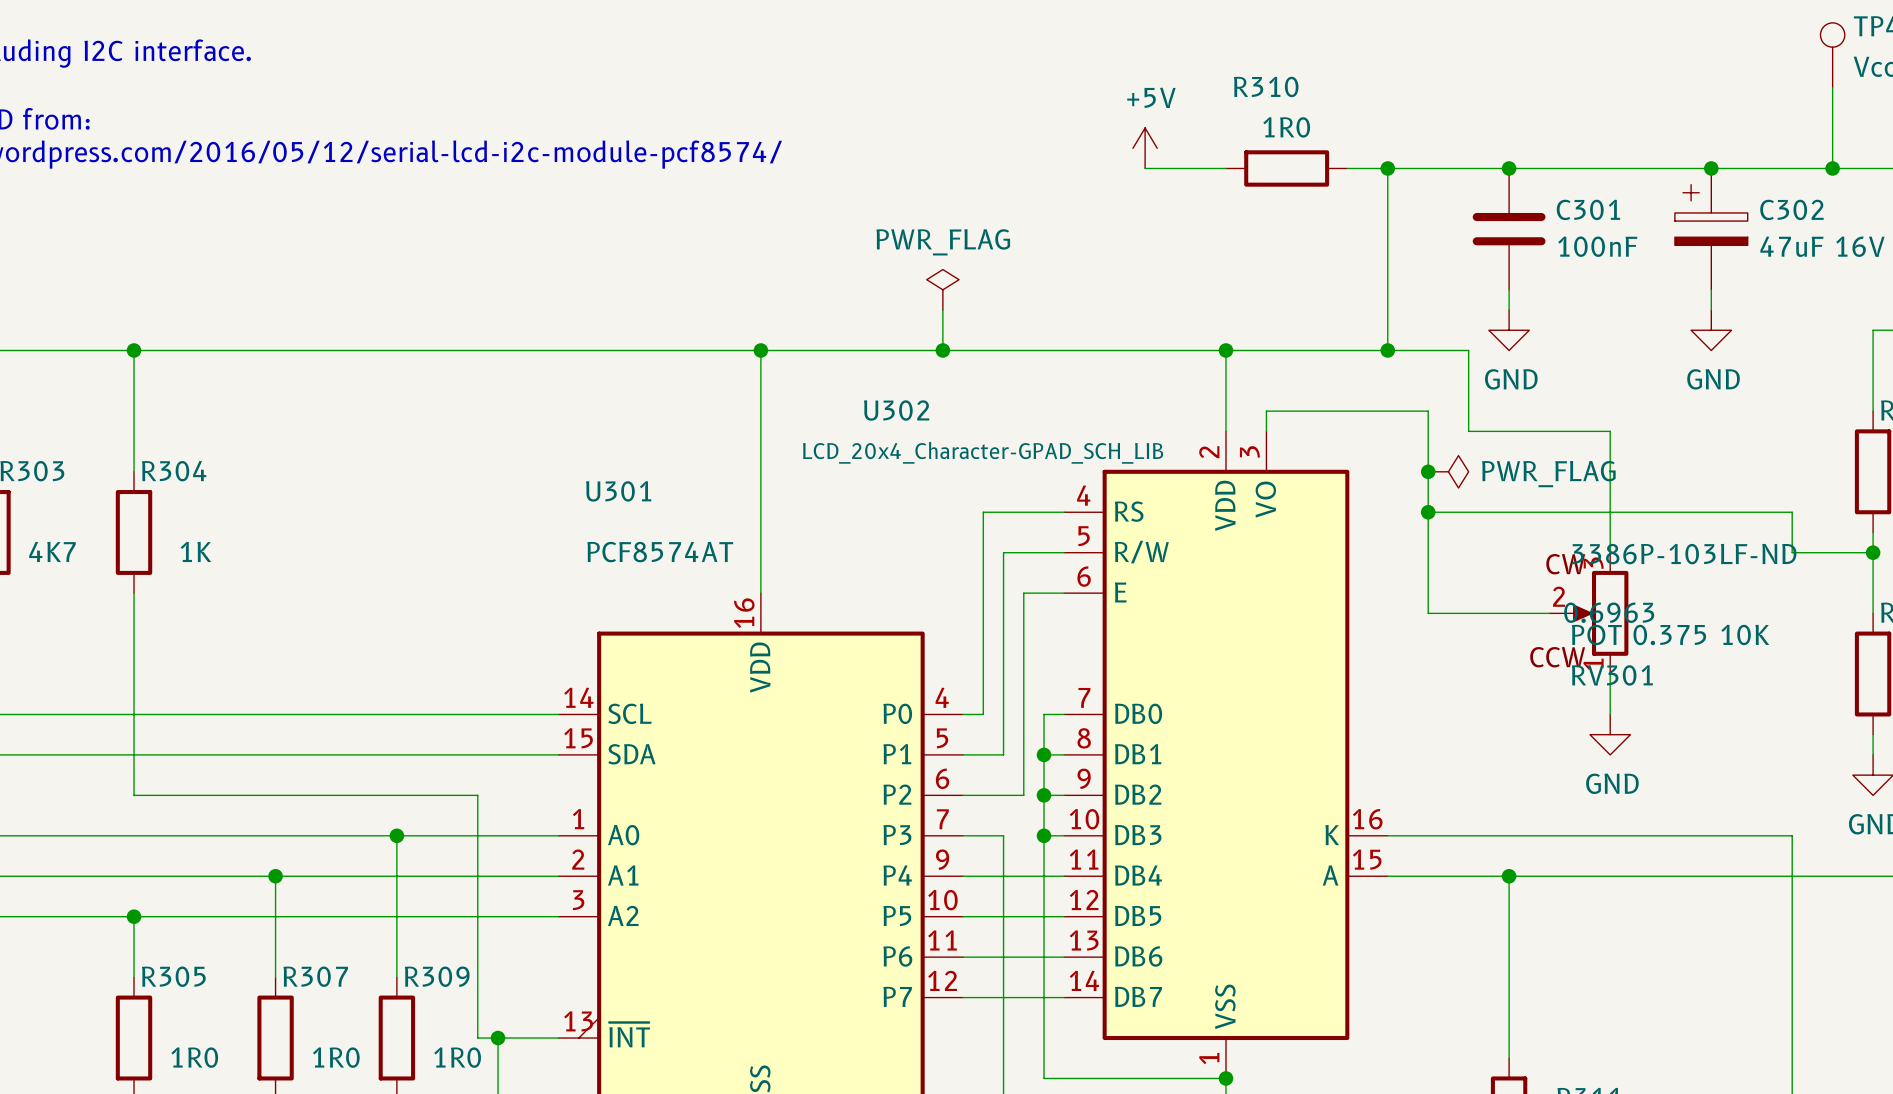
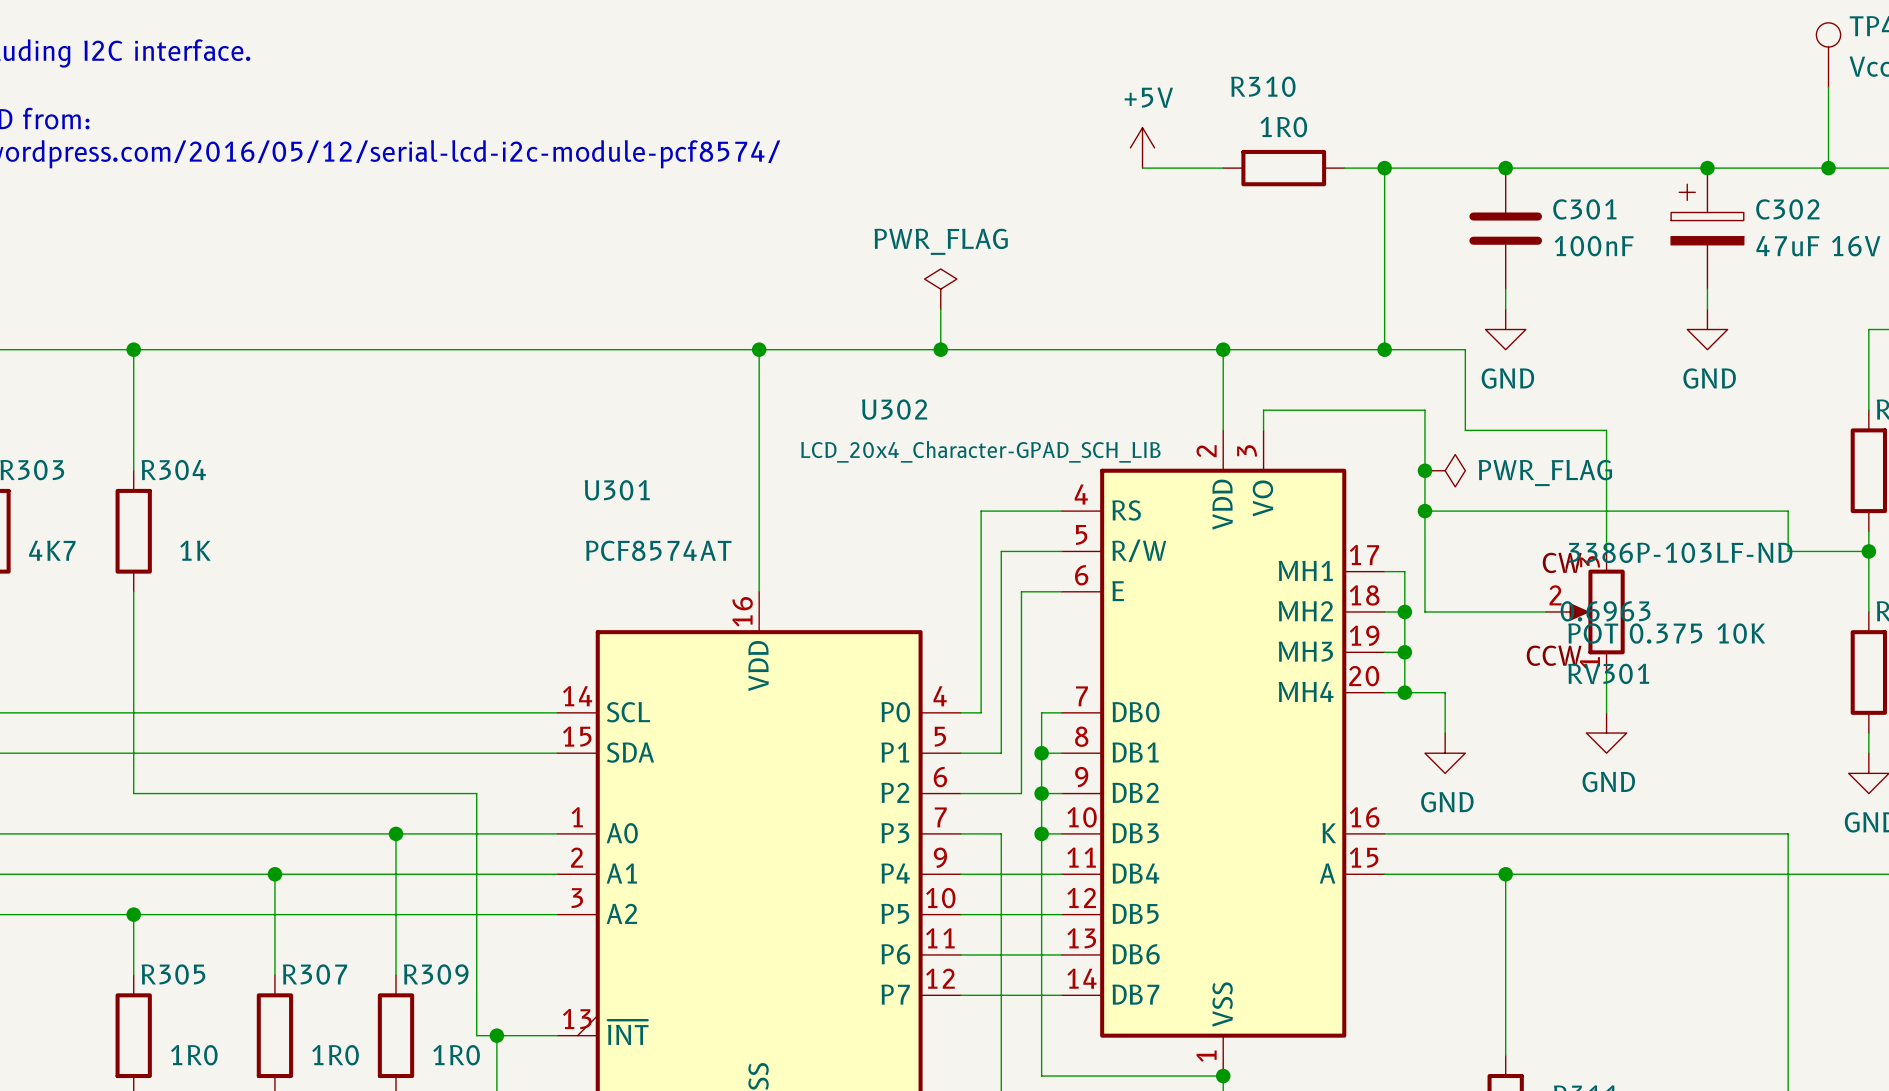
U302 symbol: [1064, 431, 1388, 1079] -> [1061, 430, 1385, 1077]
wire: none -> (1384, 571) (1404, 571) (1404, 692)
wire: none -> (1384, 611) (1404, 611)
junction: none -> (1404, 611)
wire: none -> (1384, 652) (1404, 652)
junction: none -> (1404, 652)
wire: none -> (1384, 692) (1445, 692) (1445, 733)
junction: none -> (1404, 692)
power symbol: none -> GND (1445, 753)

